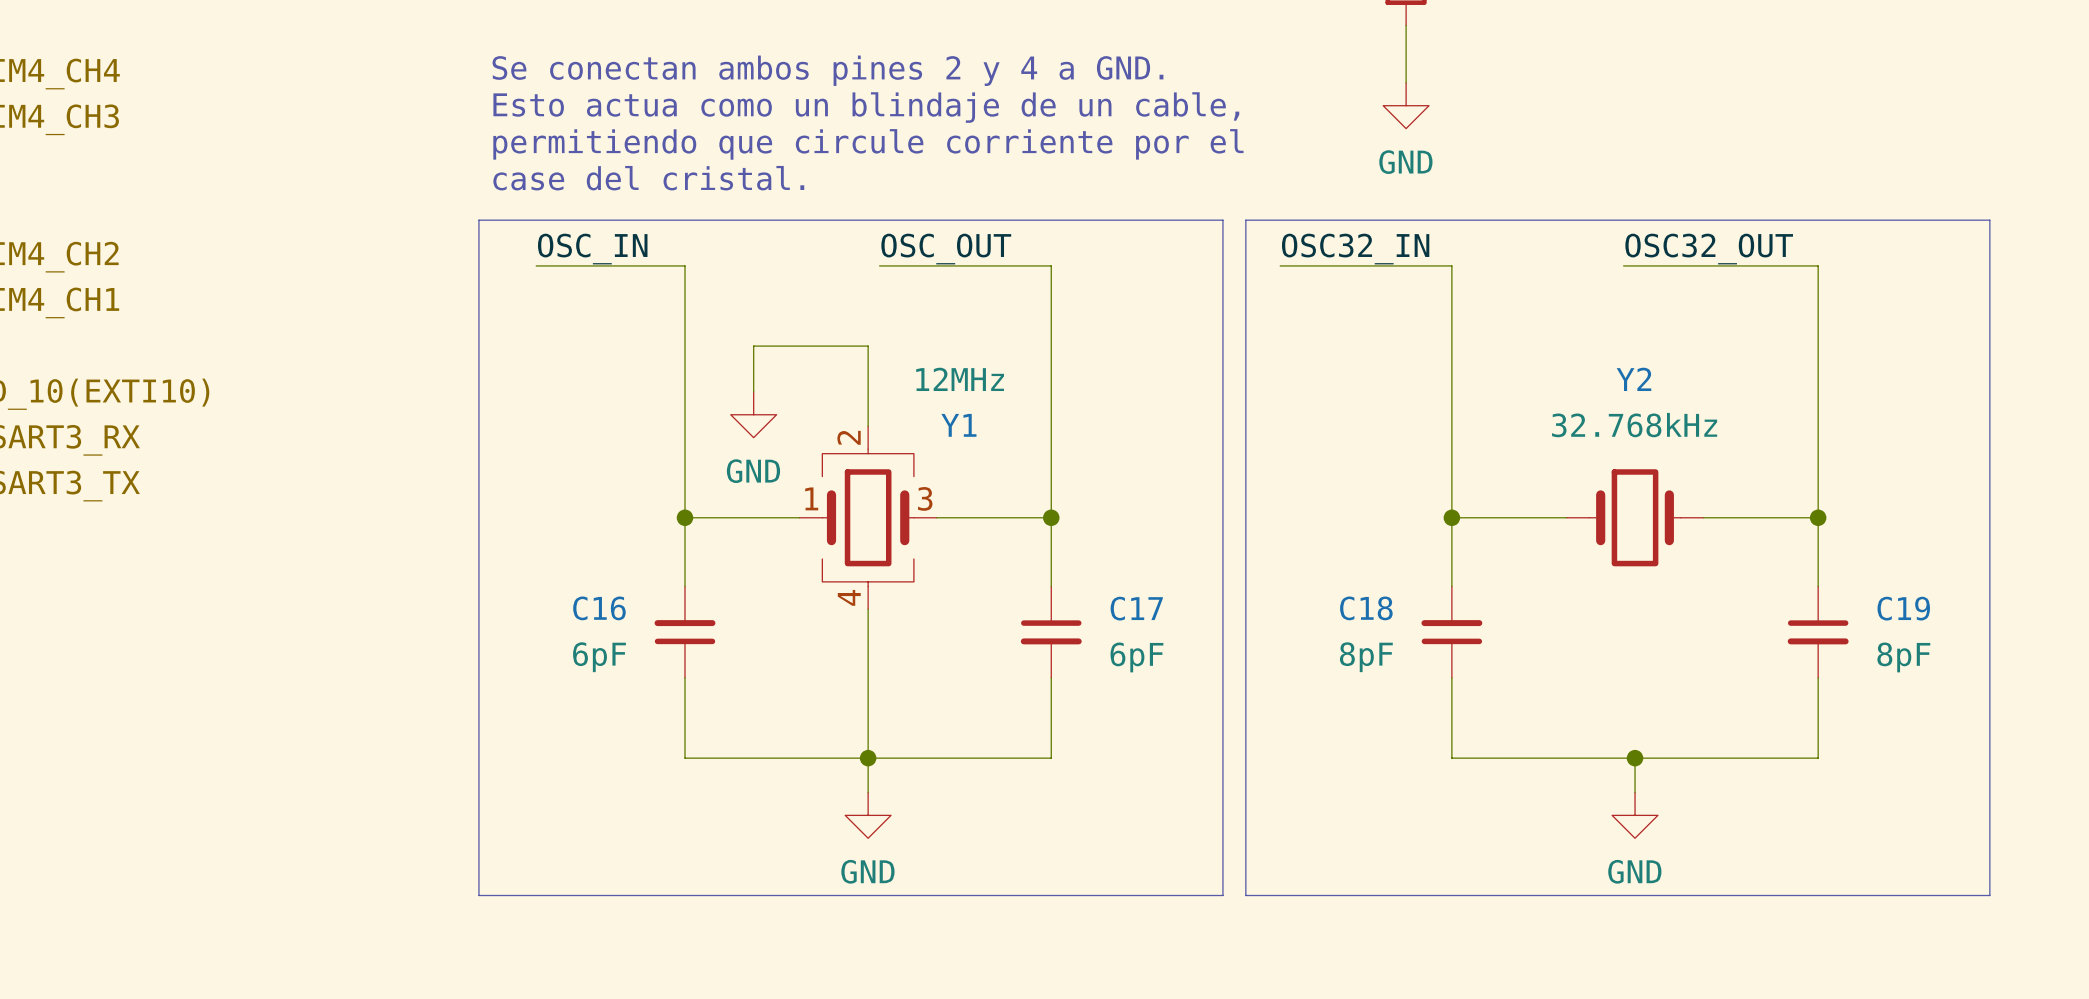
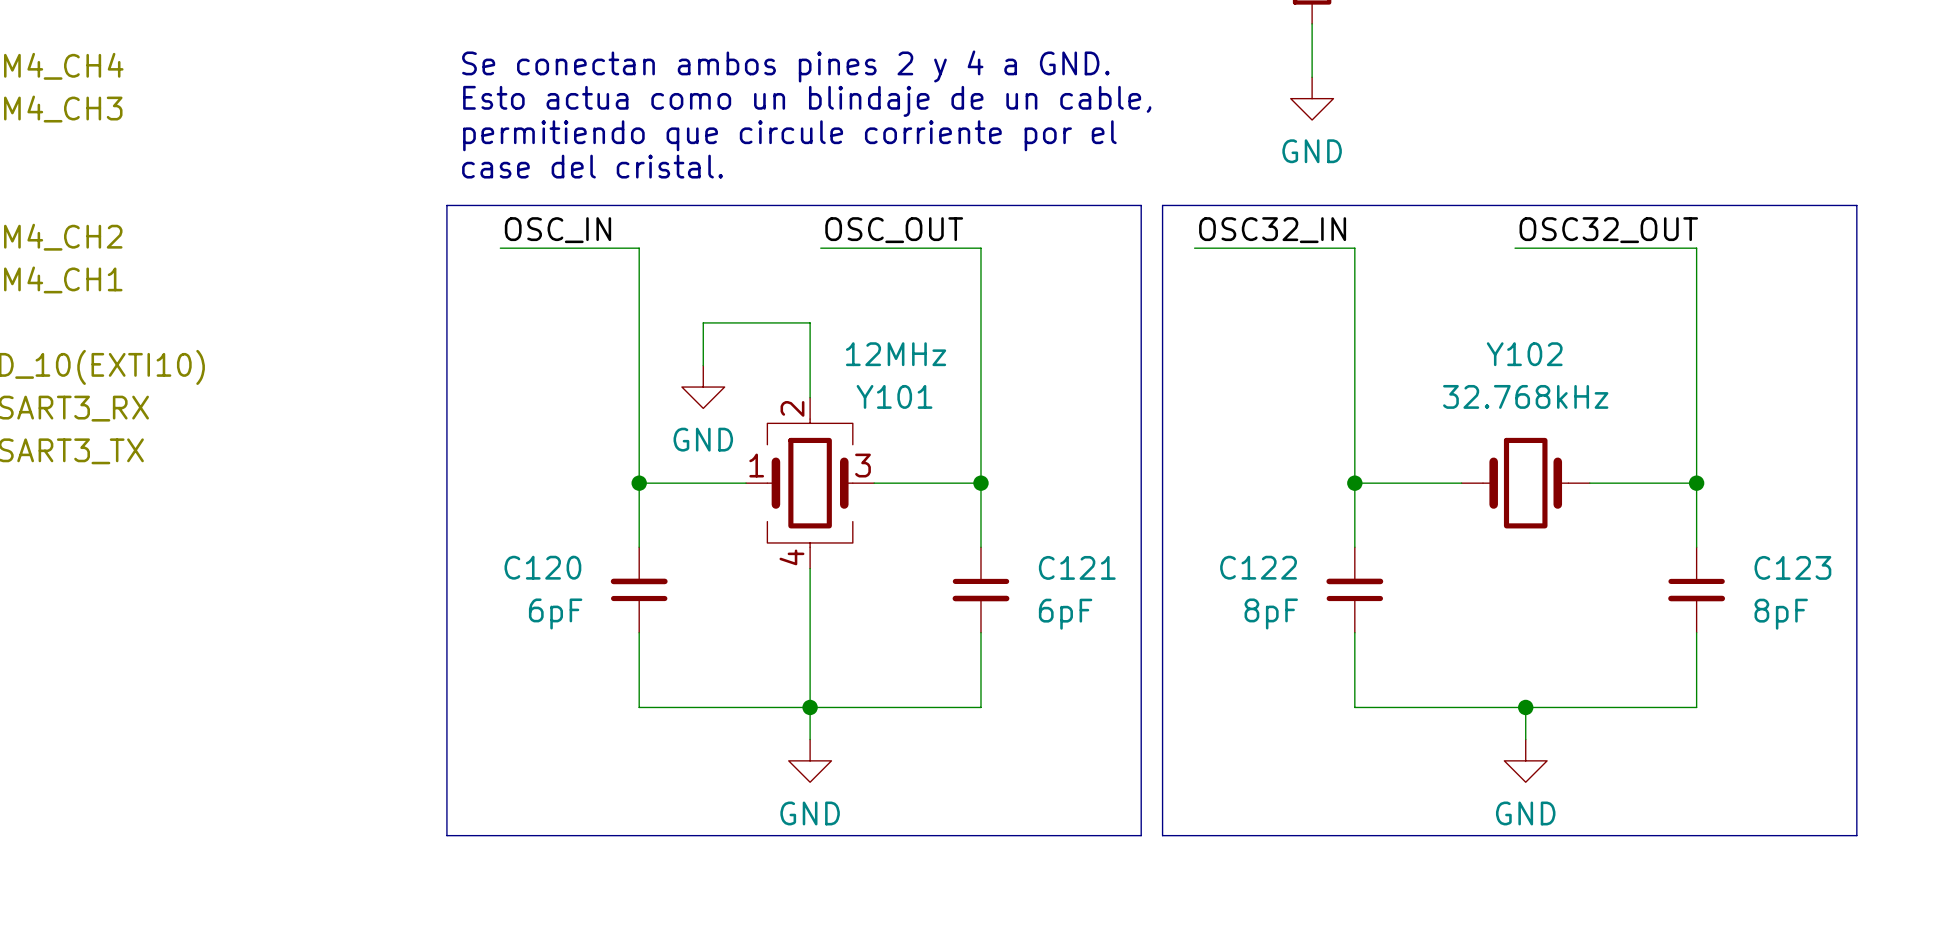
Y2 name: Y2 (1633, 379) -> Y102 (1524, 354)
Y1 name: Y1 (958, 425) -> Y101 (894, 396)
C16 name: C16 (599, 608) -> C120 (542, 567)
C17 name: C17 (1136, 608) -> C121 (1077, 567)
C18 name: C18 (1366, 608) -> C122 (1258, 567)
C19 name: C19 (1903, 608) -> C123 (1792, 567)

